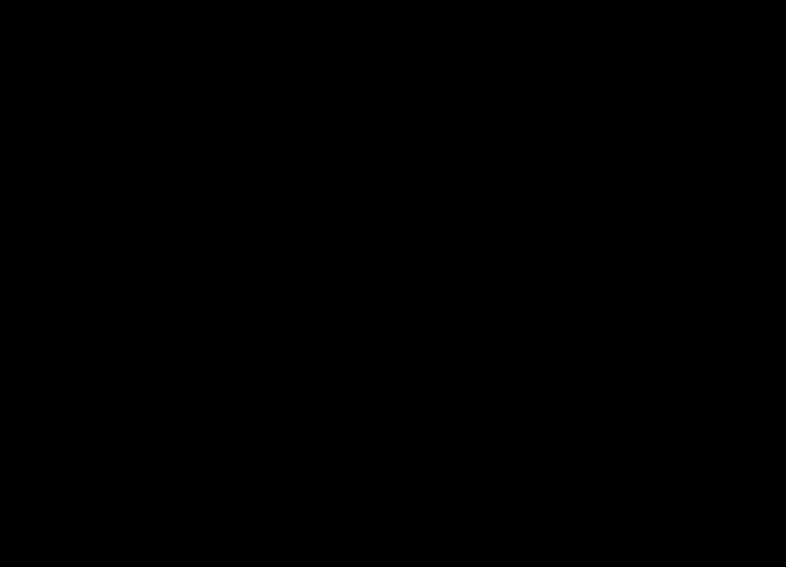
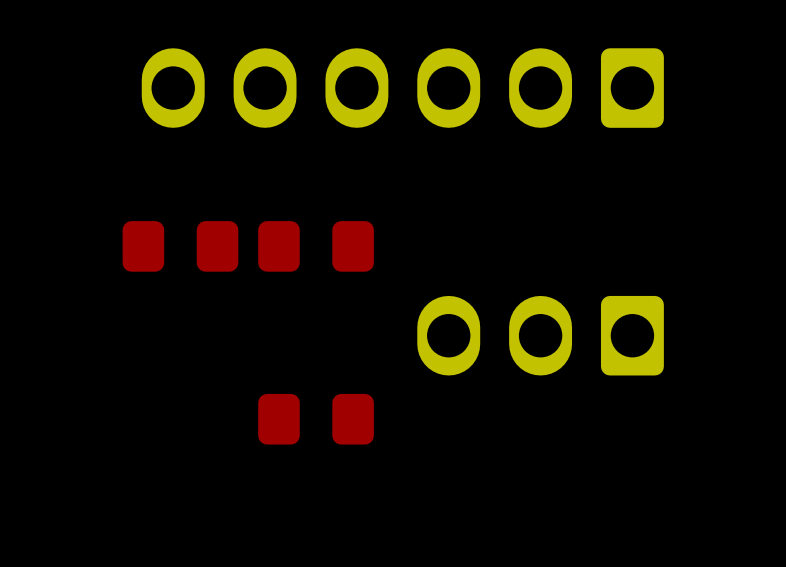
part: none -> (402, 88)
part: none -> (180, 246)
part: none -> (316, 246)
part: none -> (540, 335)
part: none -> (316, 419)

